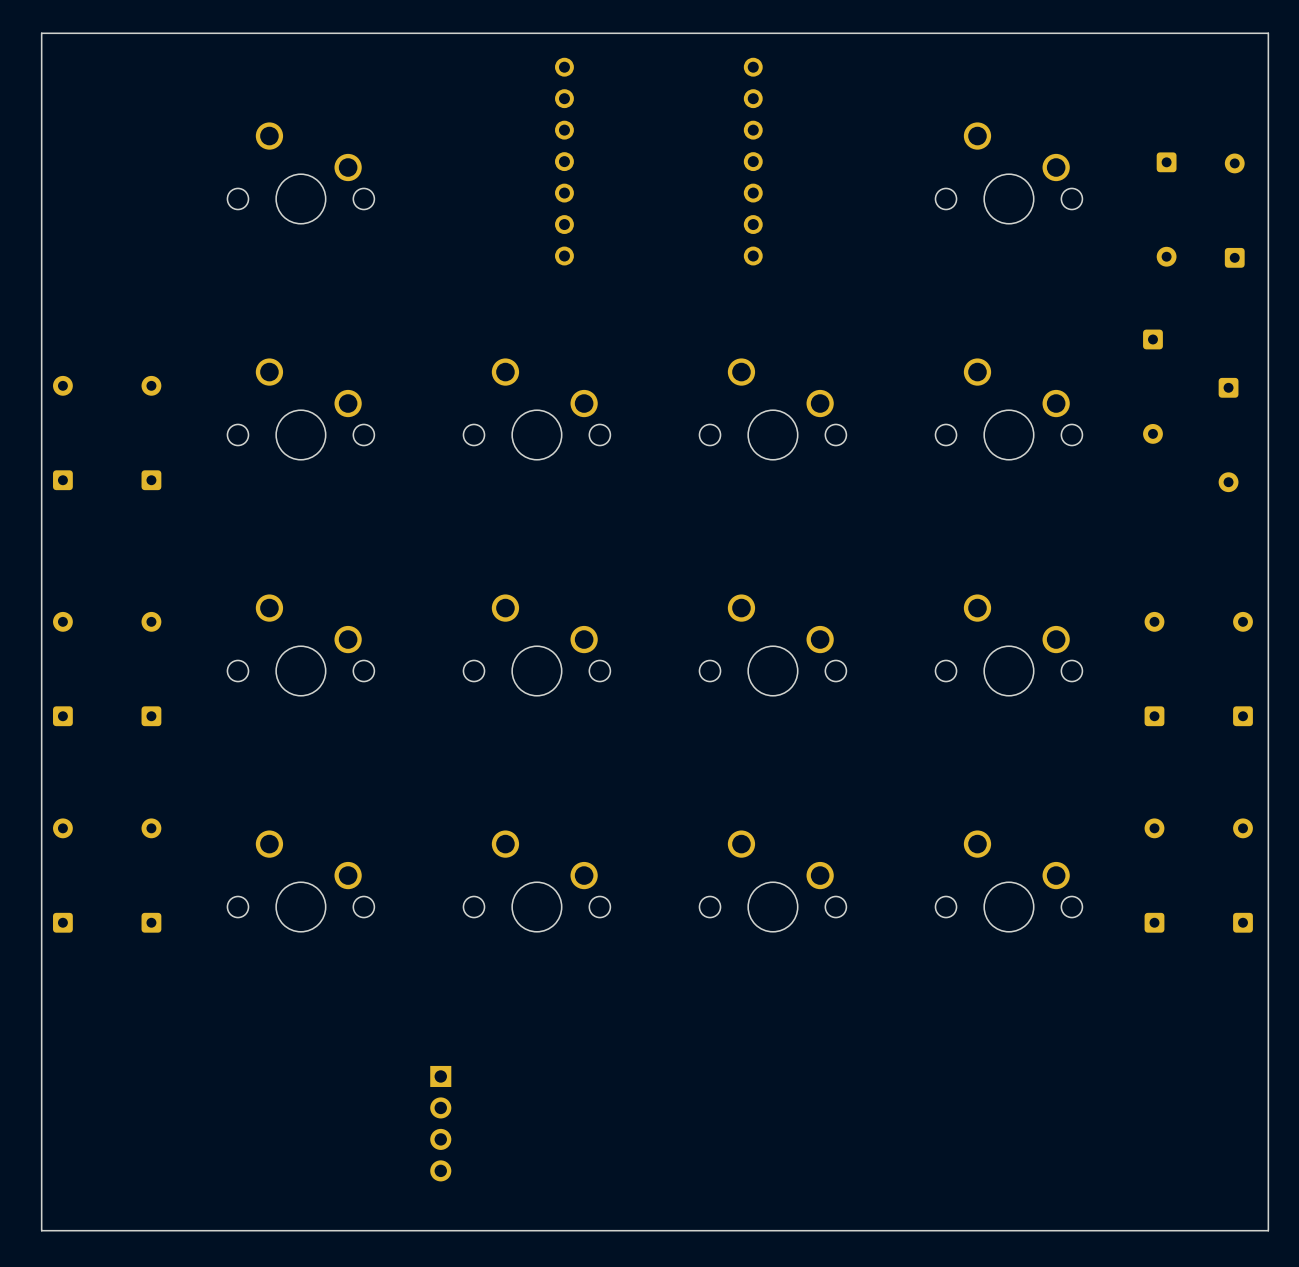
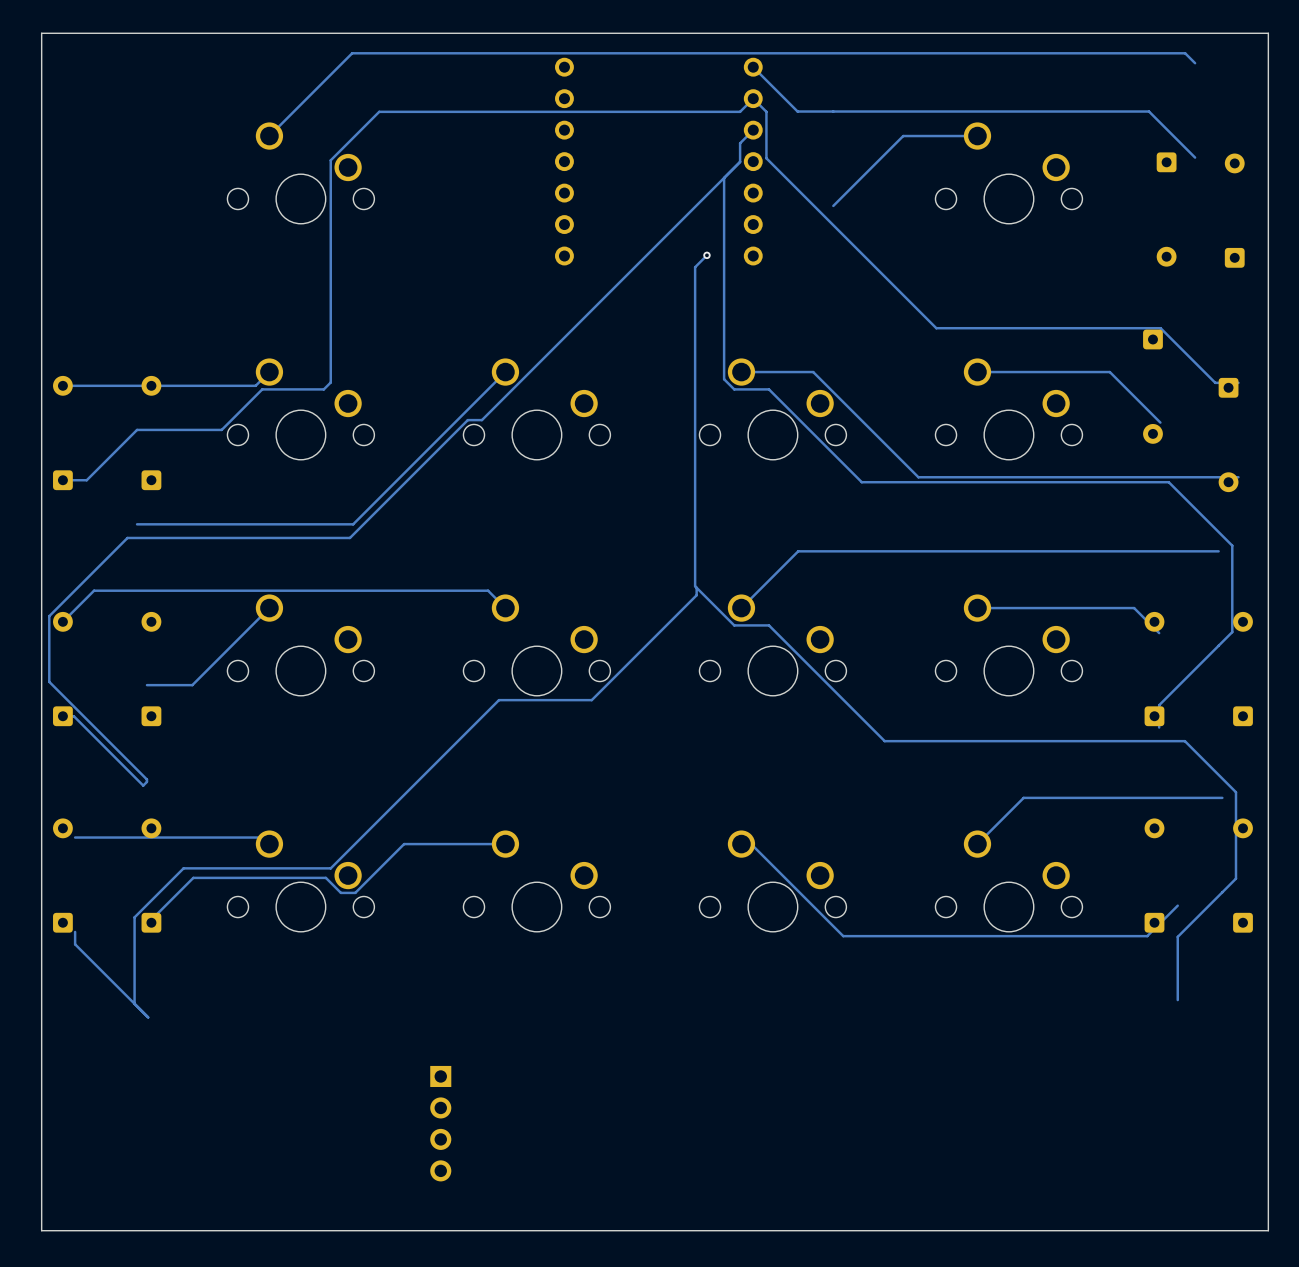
track: none -> (1195, 63) (1185, 53) (352, 53) (269, 136)
track: none -> (753, 67) (797, 111) (1149, 111) (1195, 157)
track: none -> (753, 130) (740, 143) (740, 161) (481, 420) (467, 420) (349, 537) (127, 537) (49, 616) (49, 681) (146, 779) (143, 785) (73, 716) (62, 716)
track: none -> (977, 136) (903, 136) (833, 205)
track: none -> (724, 177) (724, 379) (734, 389) (768, 389) (861, 482) (1168, 482) (1232, 545) (1232, 632) (1159, 705) (1159, 727)
track: none -> (706, 255) (695, 267) (695, 586) (734, 625) (768, 625) (884, 741) (1184, 741) (1236, 792) (1236, 878) (1177, 936) (1177, 1000)
via: none -> (706, 255)
track: none -> (269, 372) (255, 385) (62, 385)
track: none -> (505, 372) (353, 524) (137, 524)
track: none -> (741, 372) (813, 372) (918, 477) (1238, 477)
track: none -> (977, 372) (1109, 372) (1160, 422)
track: none -> (1238, 382) (1215, 382) (1160, 328) (936, 328) (766, 158) (766, 111) (753, 98) (740, 111) (379, 111) (330, 160) (330, 382) (323, 389) (262, 389) (221, 429) (137, 429) (86, 480) (62, 480)
track: none -> (1218, 551) (798, 551) (741, 608)
track: none -> (696, 587) (696, 595) (591, 700) (498, 700) (330, 868) (183, 868) (134, 917) (134, 1003)
track: none -> (269, 608) (192, 685) (146, 685)
track: none -> (505, 608) (488, 590) (94, 590) (62, 621)
track: none -> (978, 609) (977, 608) (1134, 608) (1159, 633)
track: none -> (1222, 797) (1023, 797) (977, 844)
track: none -> (75, 837) (262, 837) (269, 844)
track: none -> (505, 844) (404, 844) (355, 892) (340, 892) (325, 877) (193, 877) (148, 923)
track: none -> (741, 844) (751, 844) (843, 936) (1147, 936) (1177, 905)
track: none -> (75, 931) (75, 944) (148, 1017)

